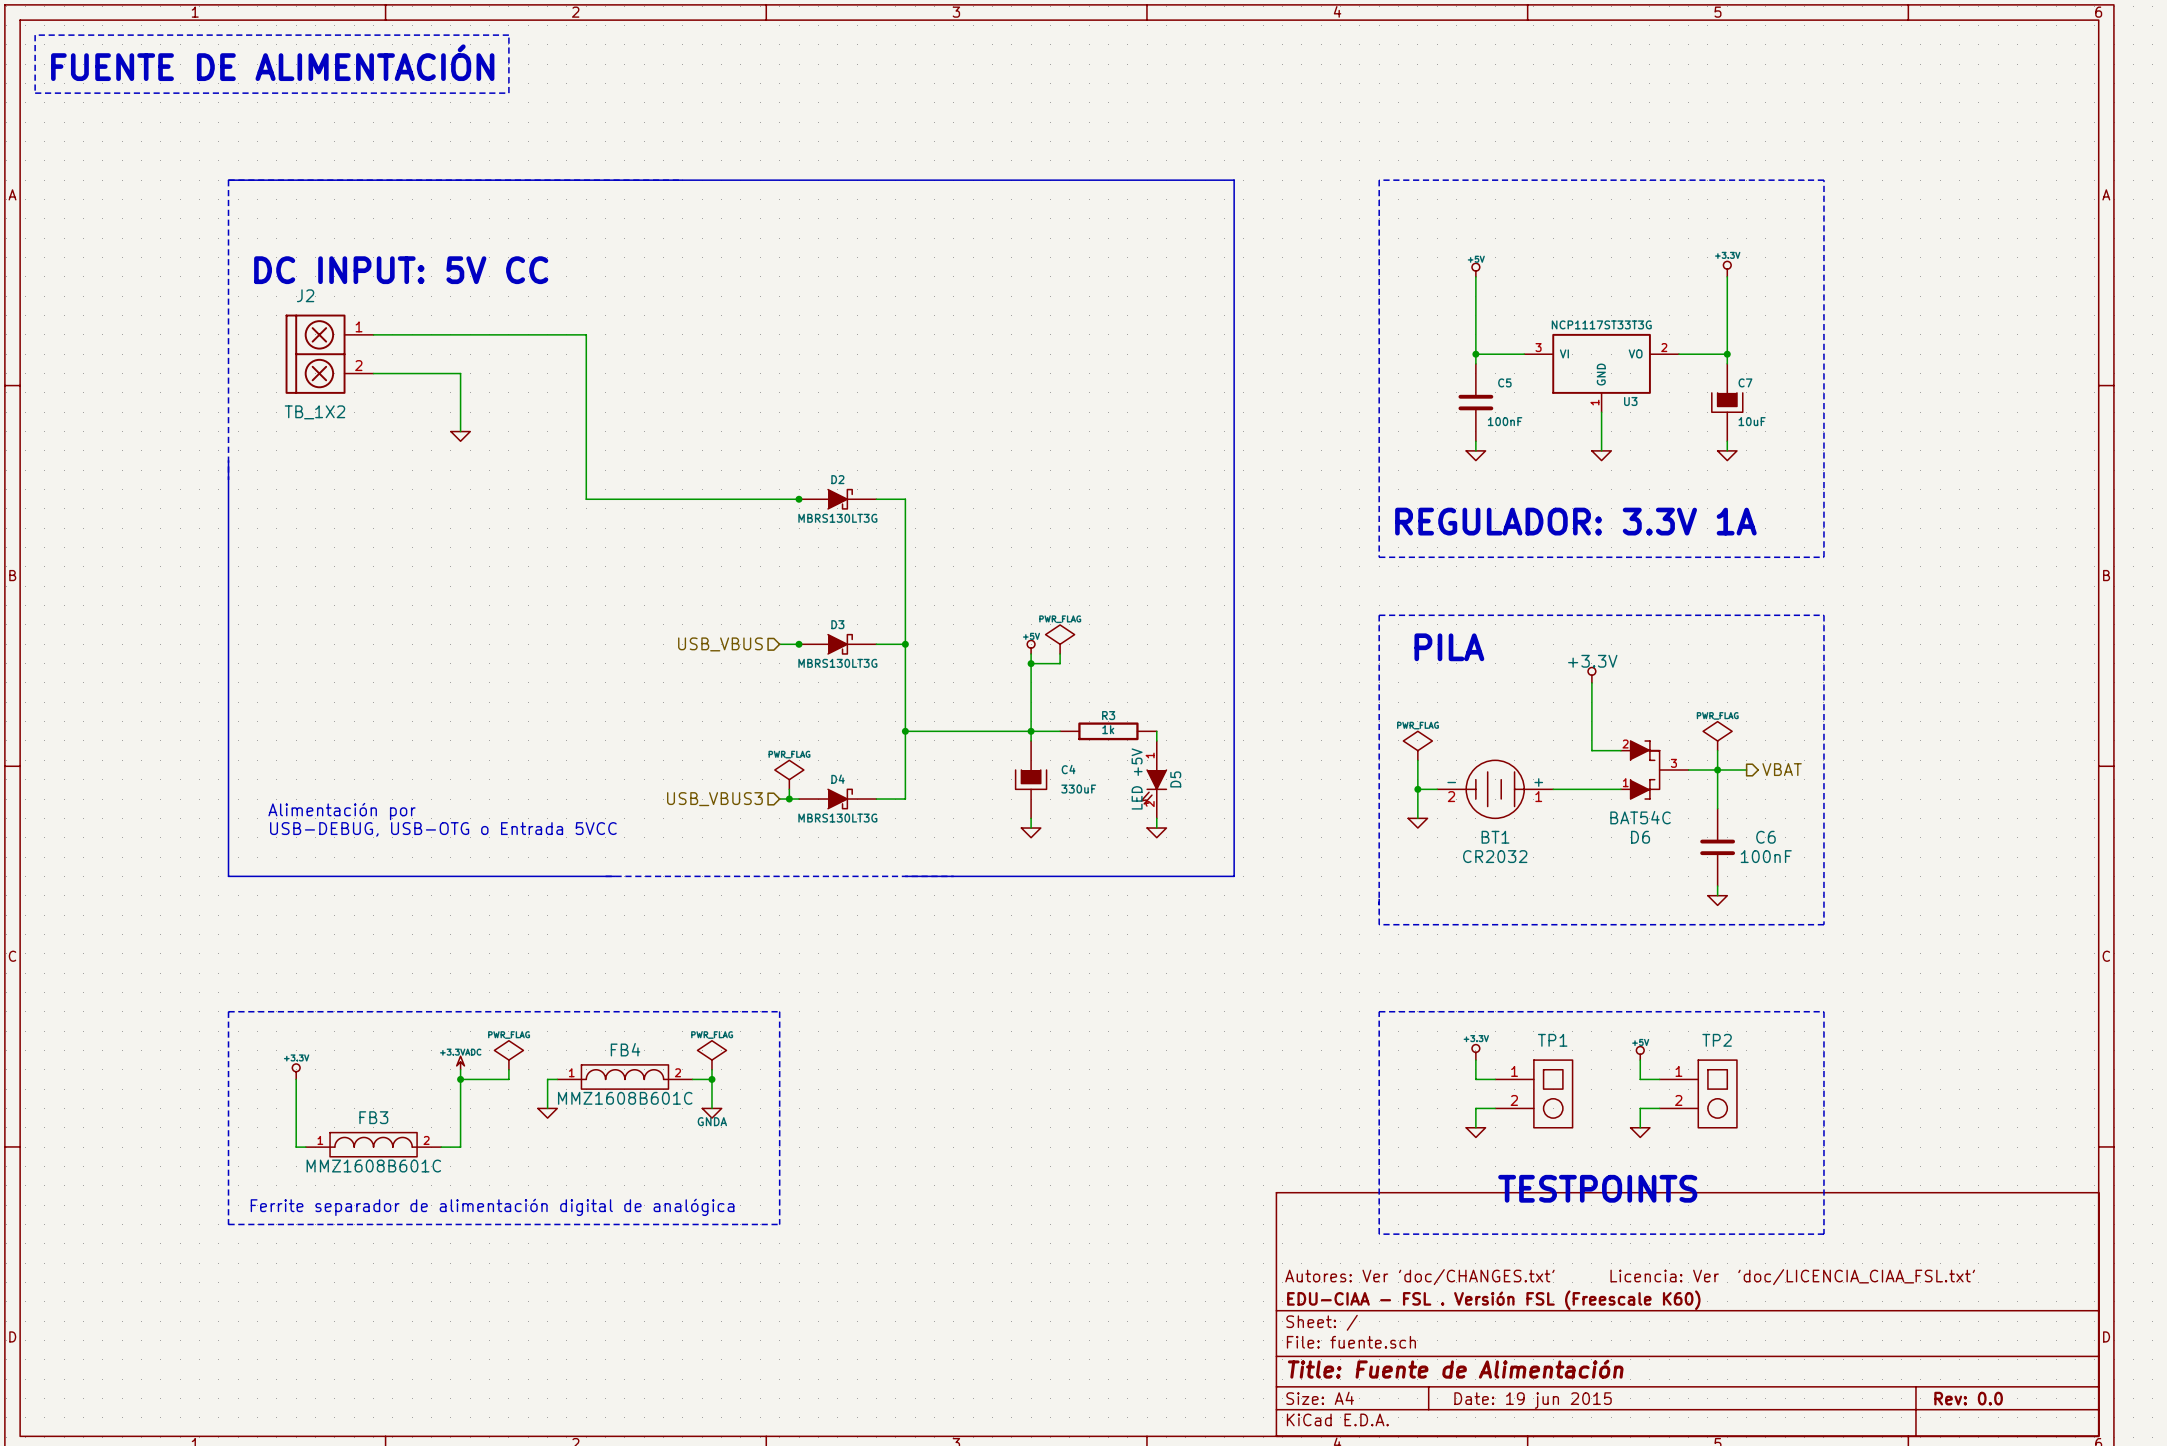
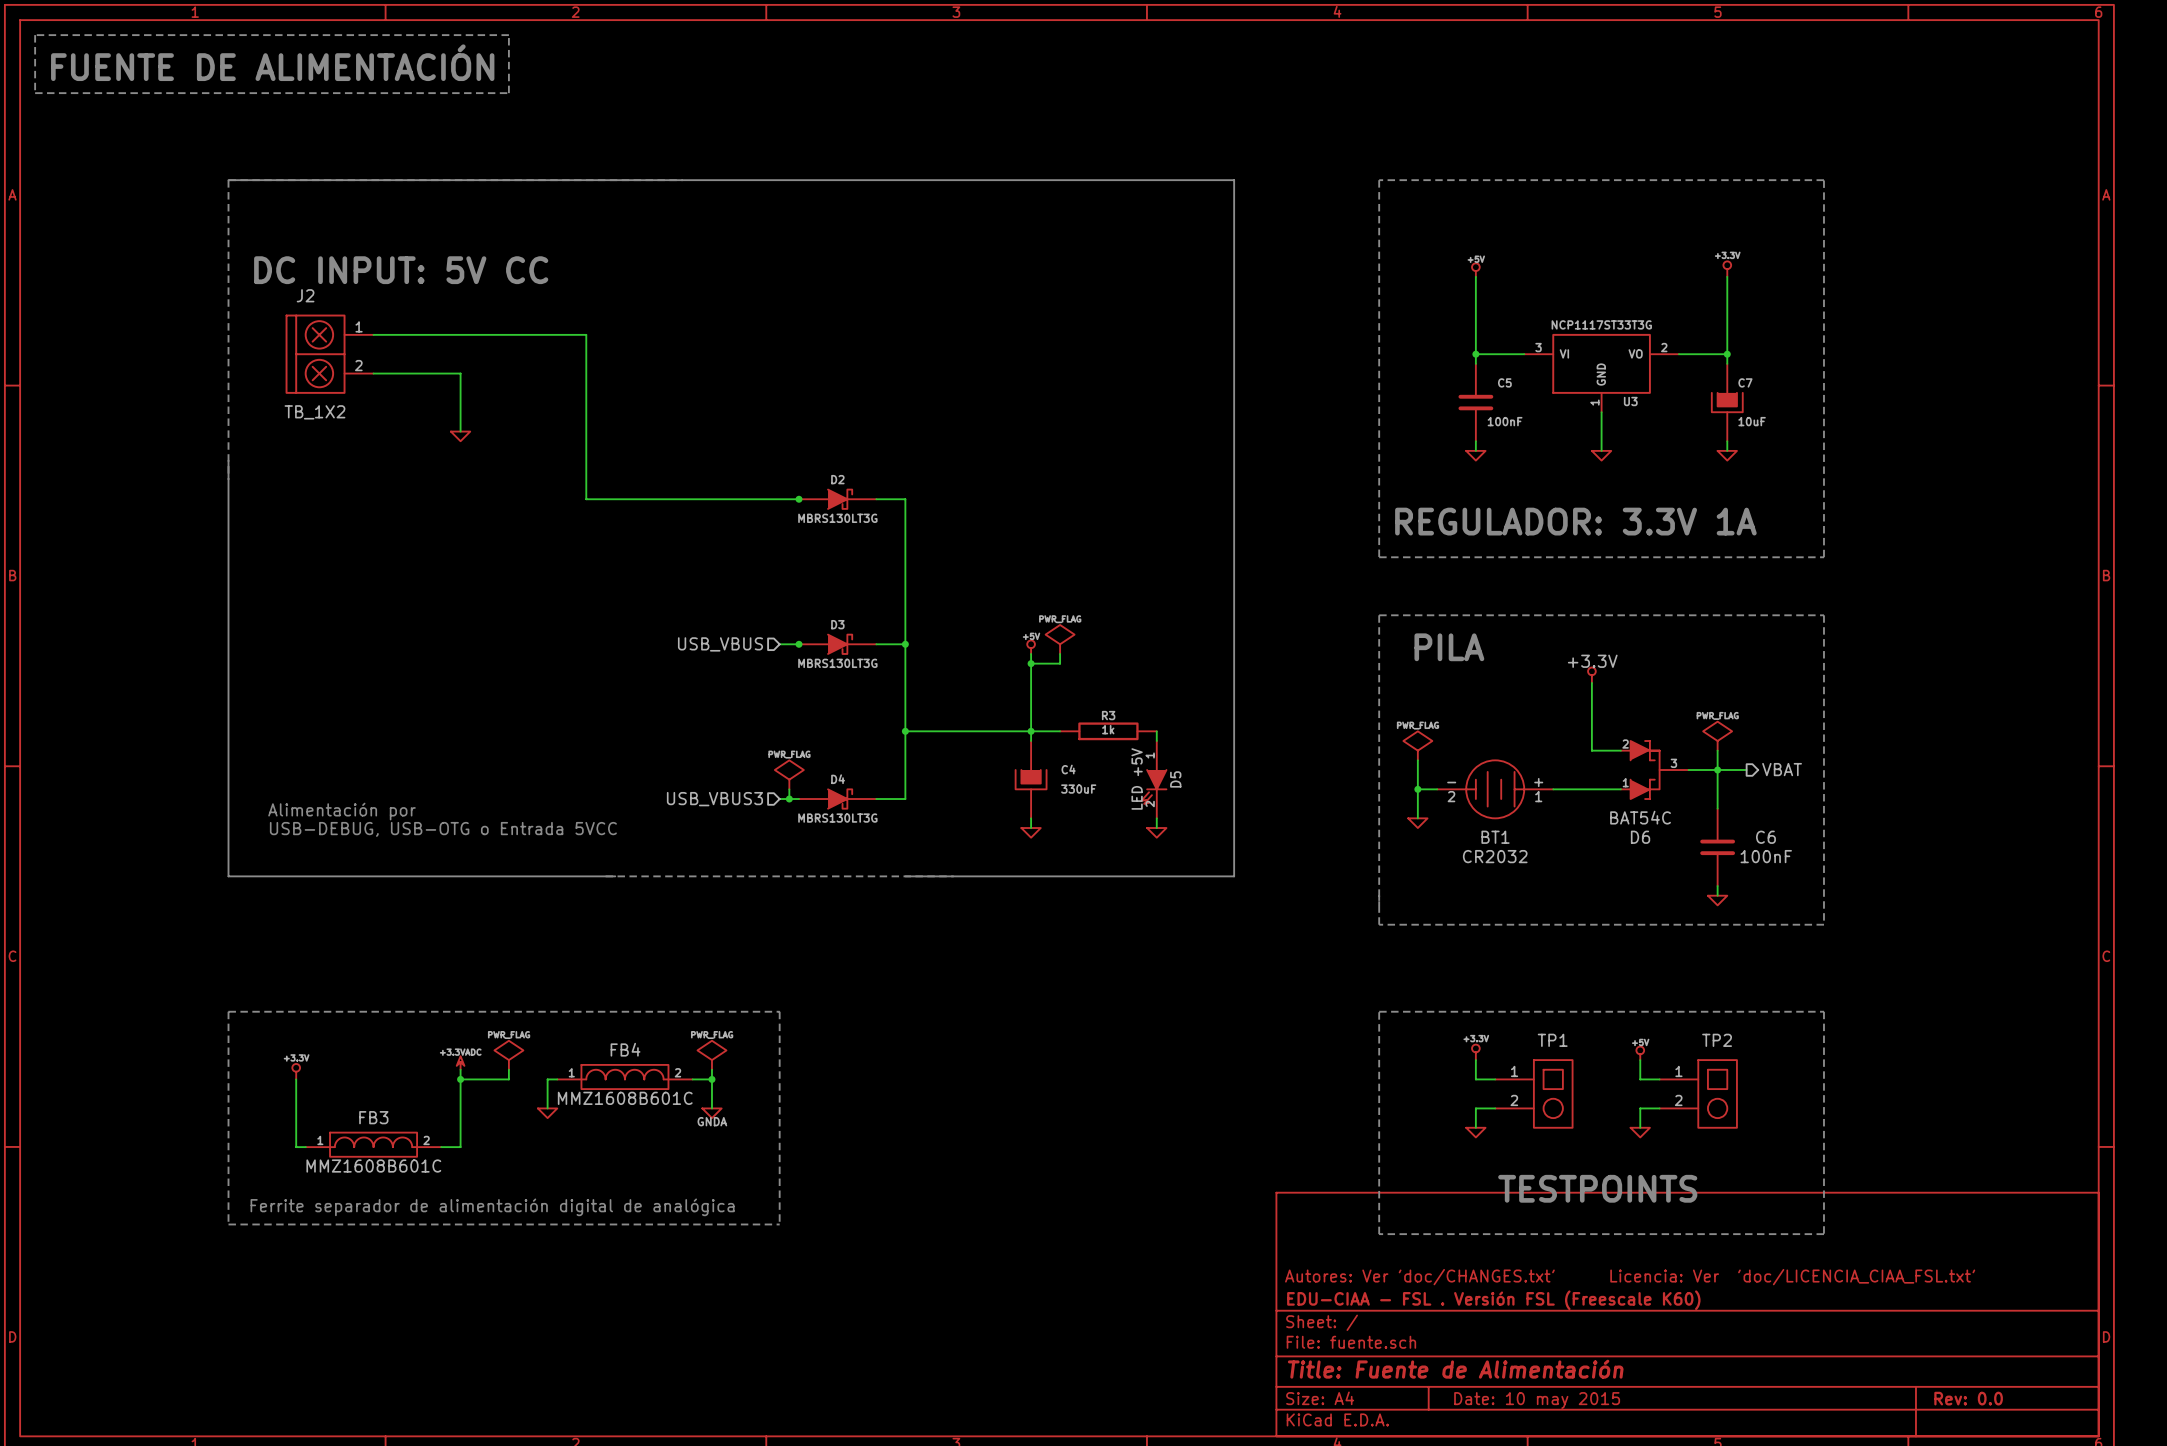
title block: Date: 19 jun 2015 (1533, 1400) -> Date: 10 may 2015 (1537, 1400)

